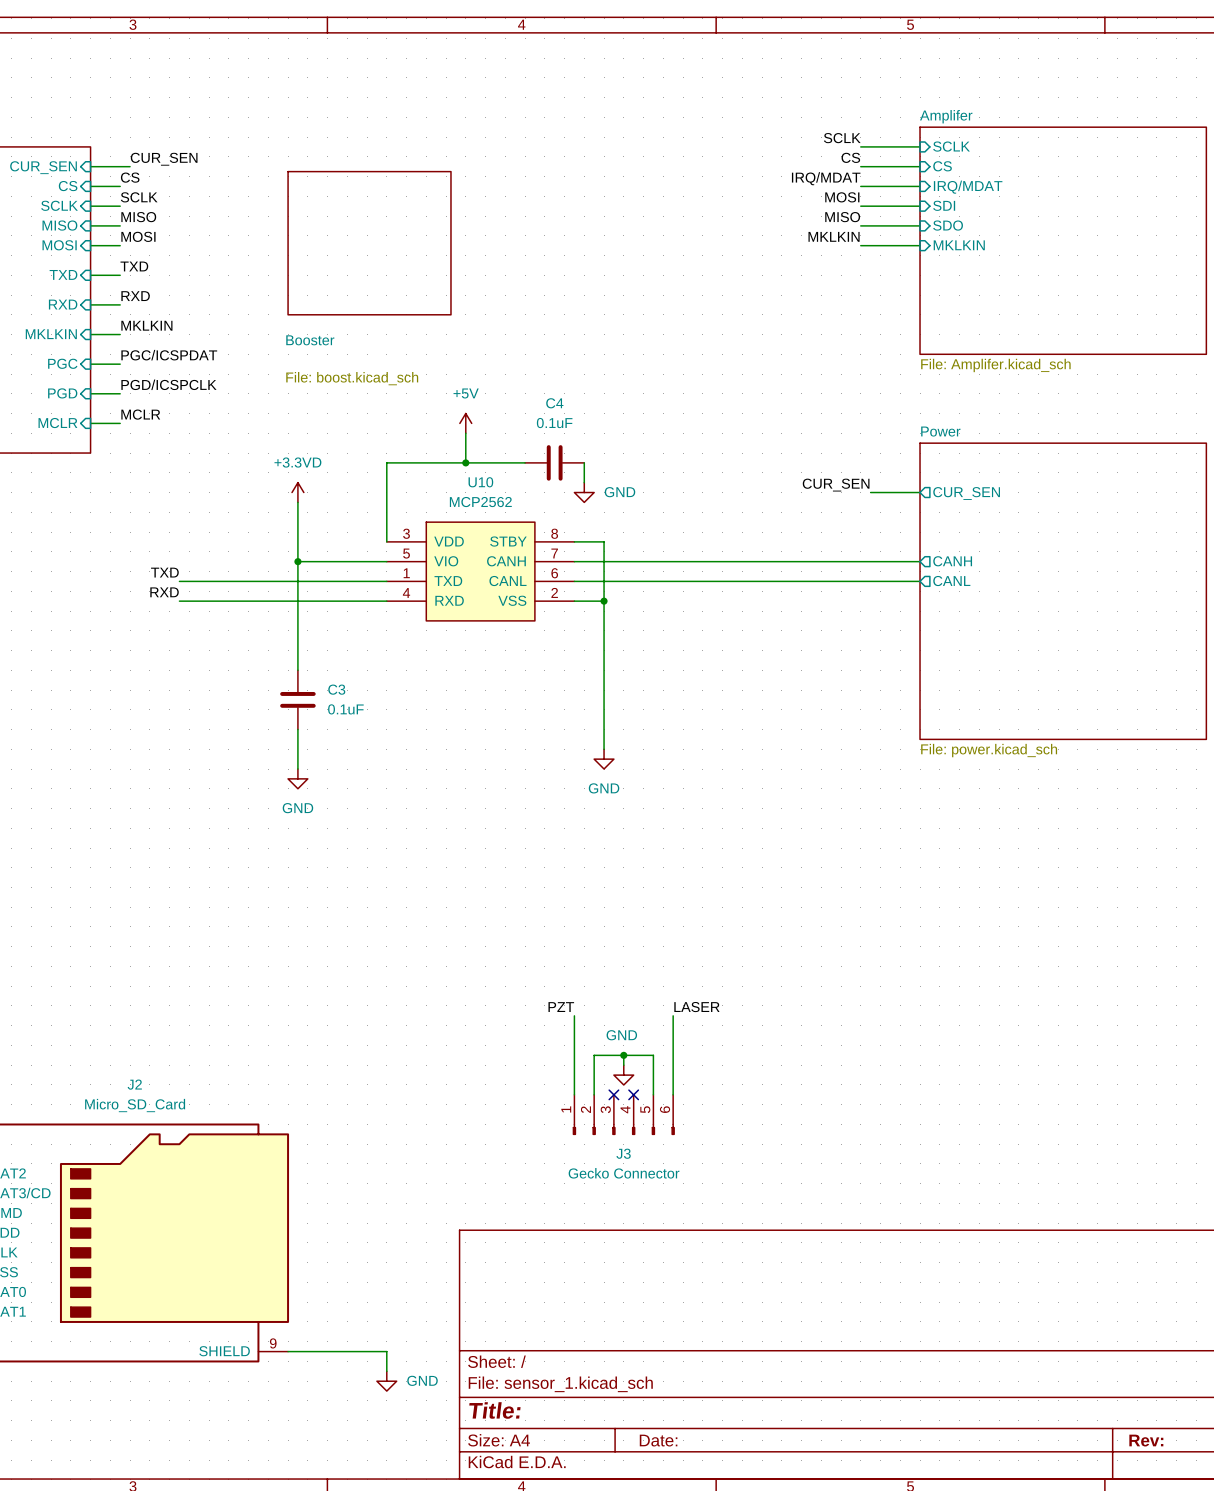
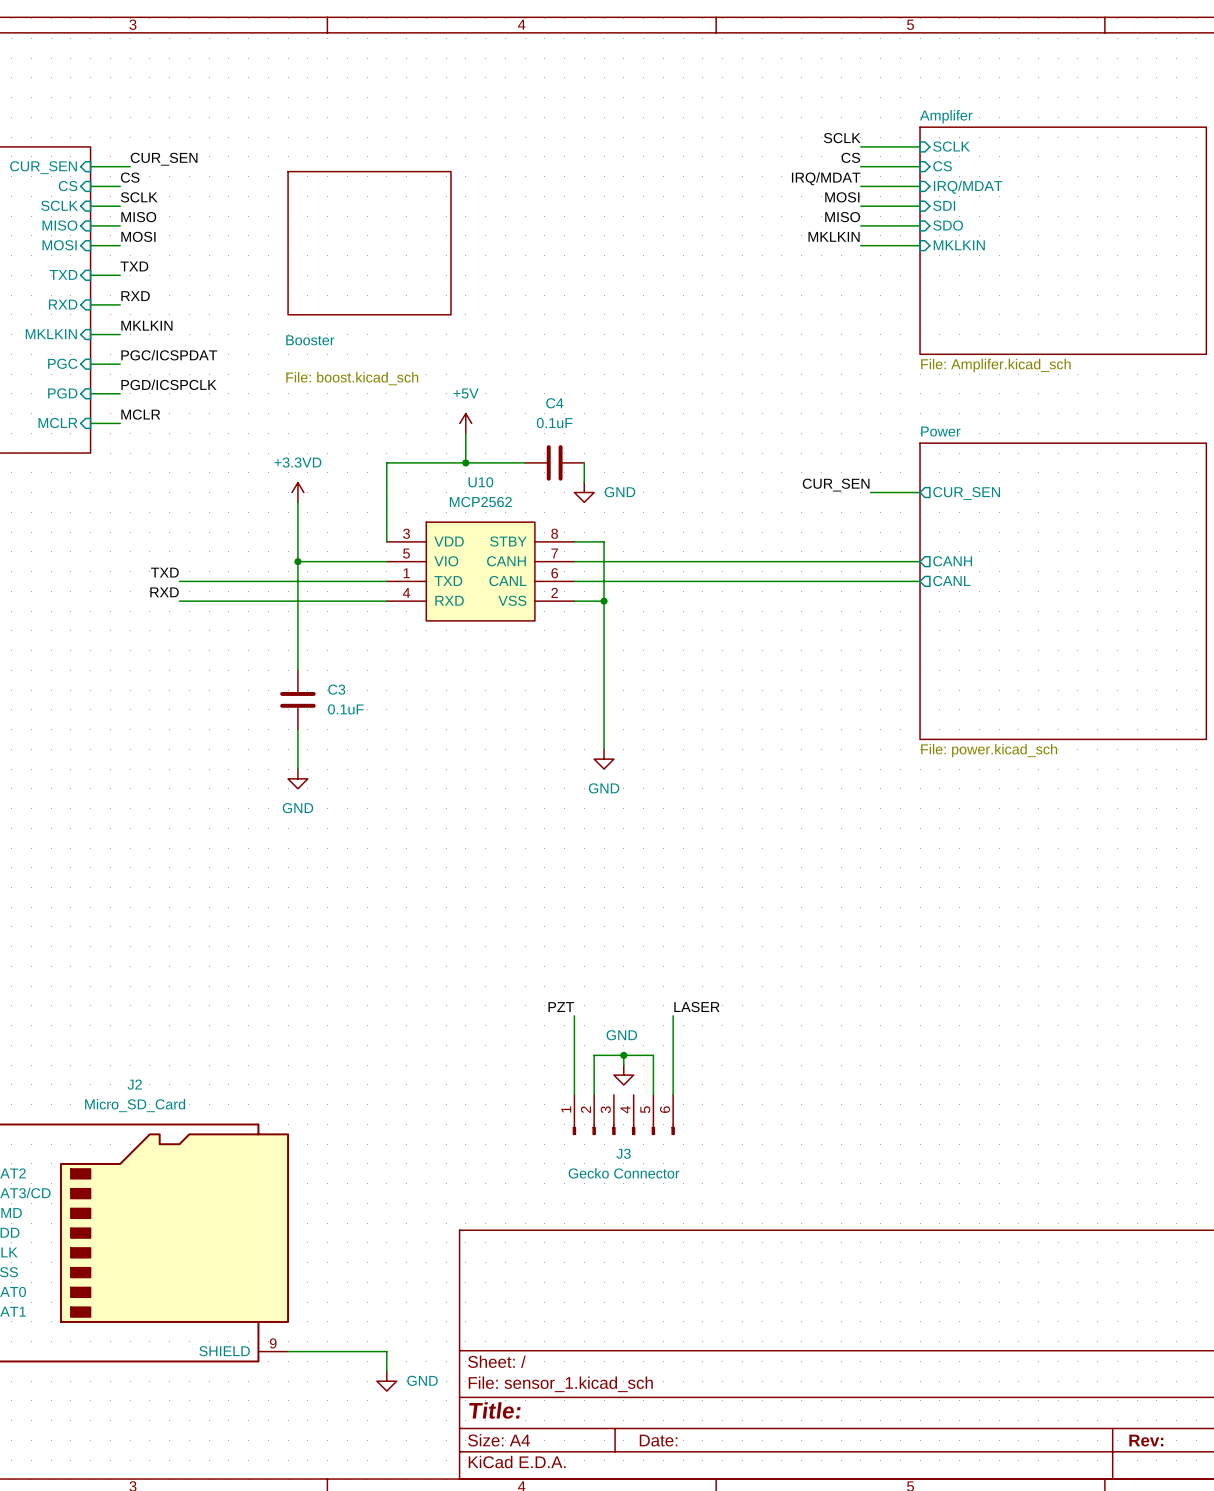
no-connect mark: (613, 1094) -> none
no-connect mark: (633, 1094) -> none

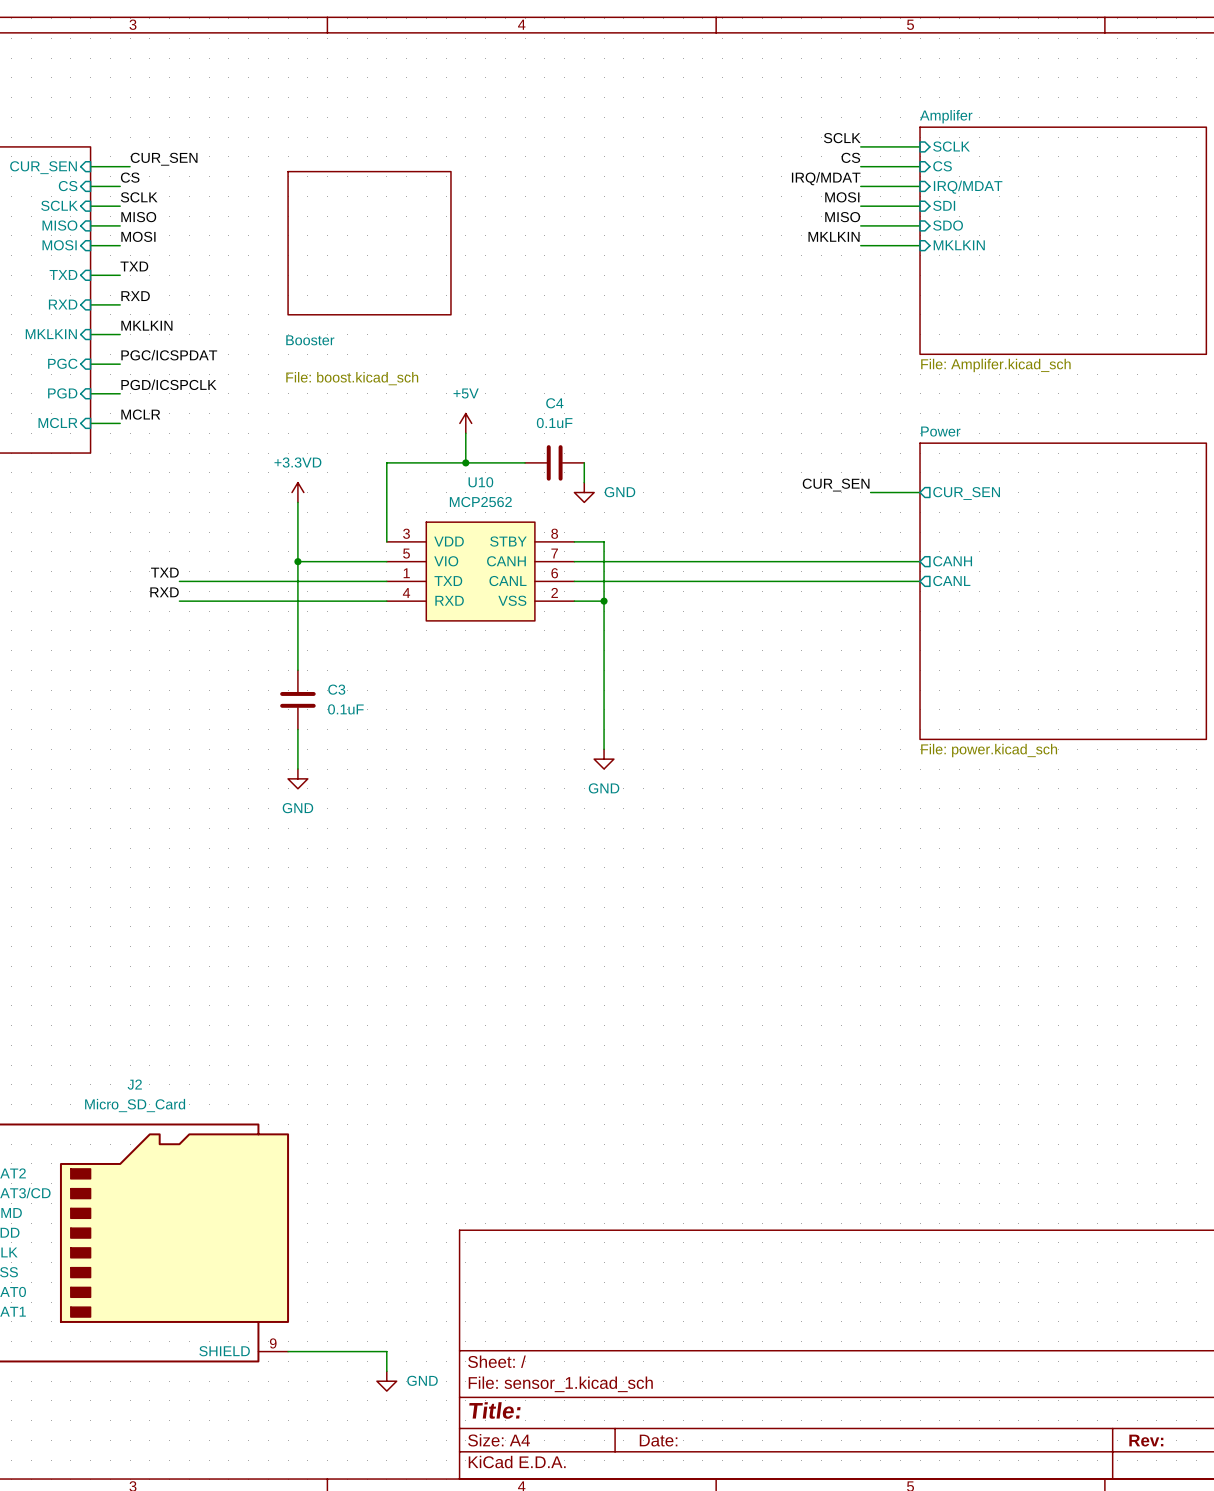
label: PZT (561, 1007) -> none
label: LASER (696, 1007) -> none
wire: (574, 1015) (574, 1094) -> none
wire: (673, 1015) (673, 1094) -> none
wire: (623, 1055) (623, 1065) -> none
junction: (623, 1055) -> none
power symbol: GND (623, 1075) -> none
wire: (594, 1094) (594, 1055) (653, 1055) (653, 1094) -> none
J3: Gecko Connector (623, 1114) -> none

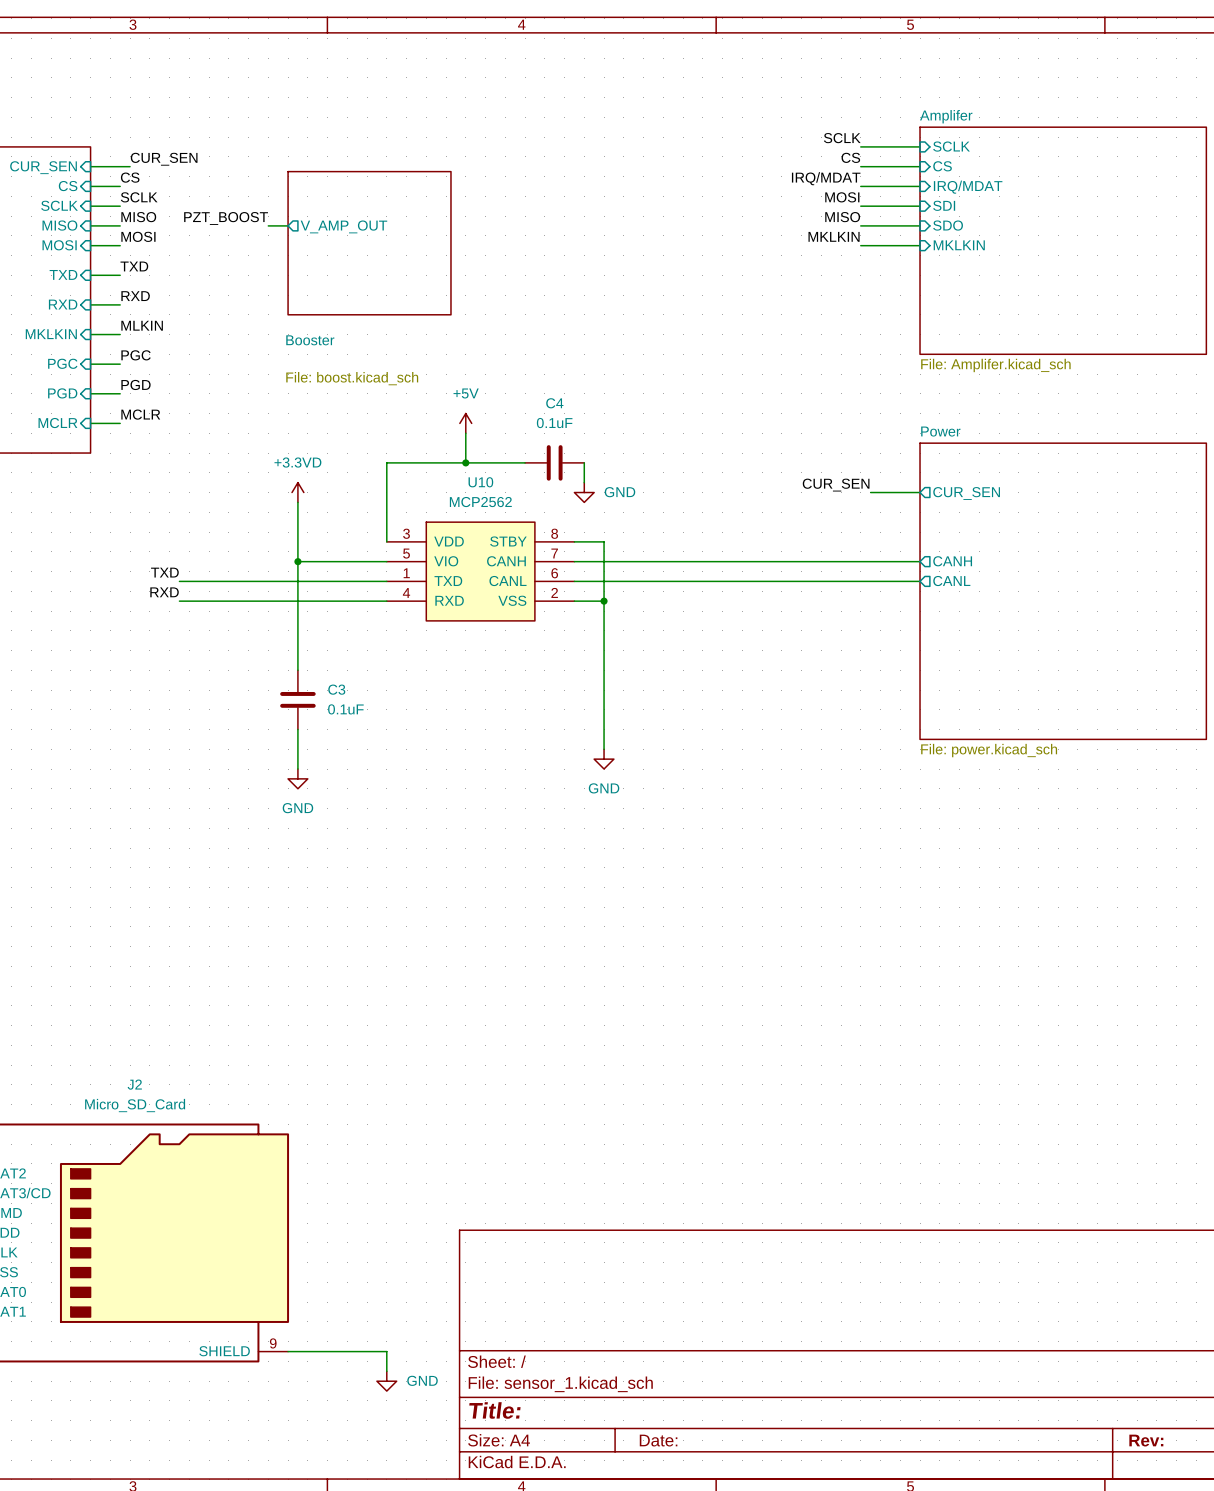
label: none -> PZT_BOOST (226, 218)
wire: none -> (268, 225) (288, 225)
sheet pin: none -> V_AMP_OUT (343, 226)
label: MKLKIN (146, 325) -> MLKIN (142, 325)
label: PGC/ICSPDAT (169, 355) -> PGC (136, 355)
label: PGD/ICSPCLK (168, 384) -> PGD (135, 384)

